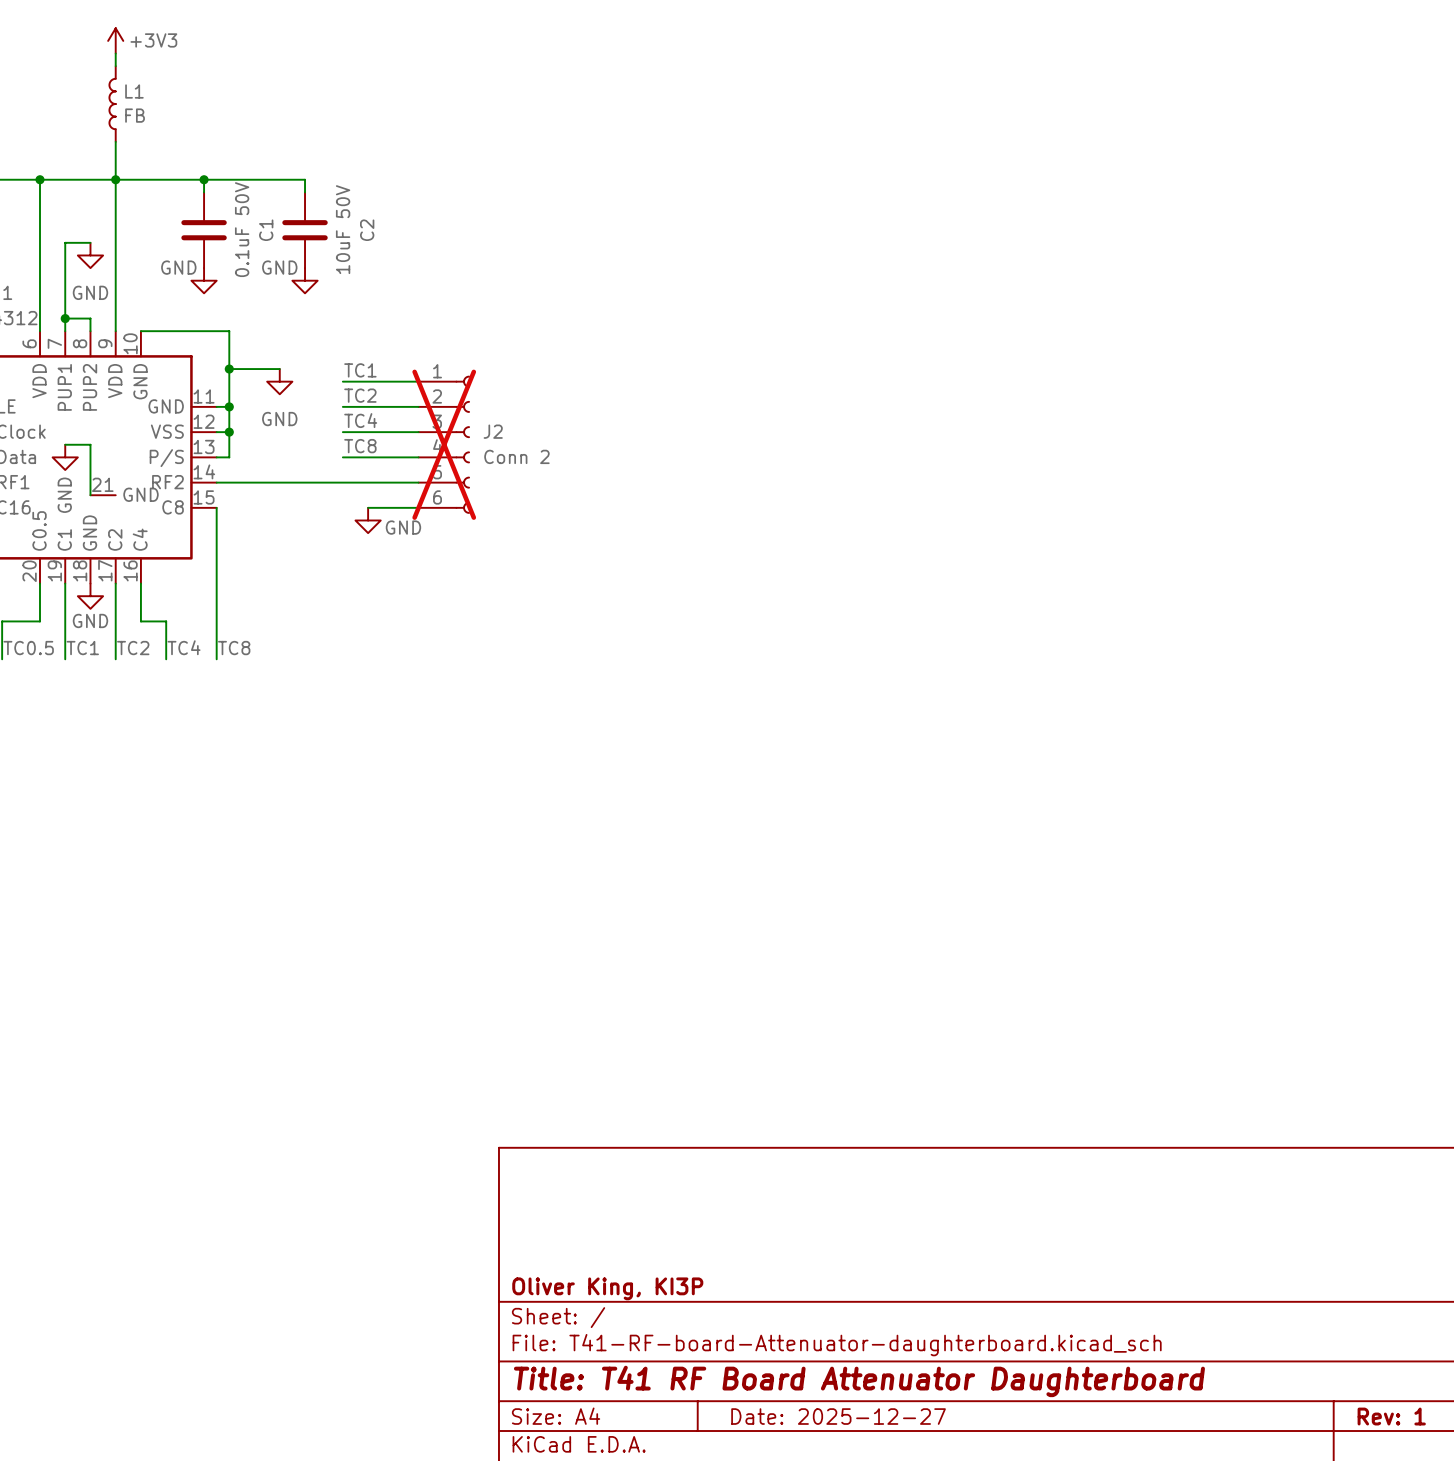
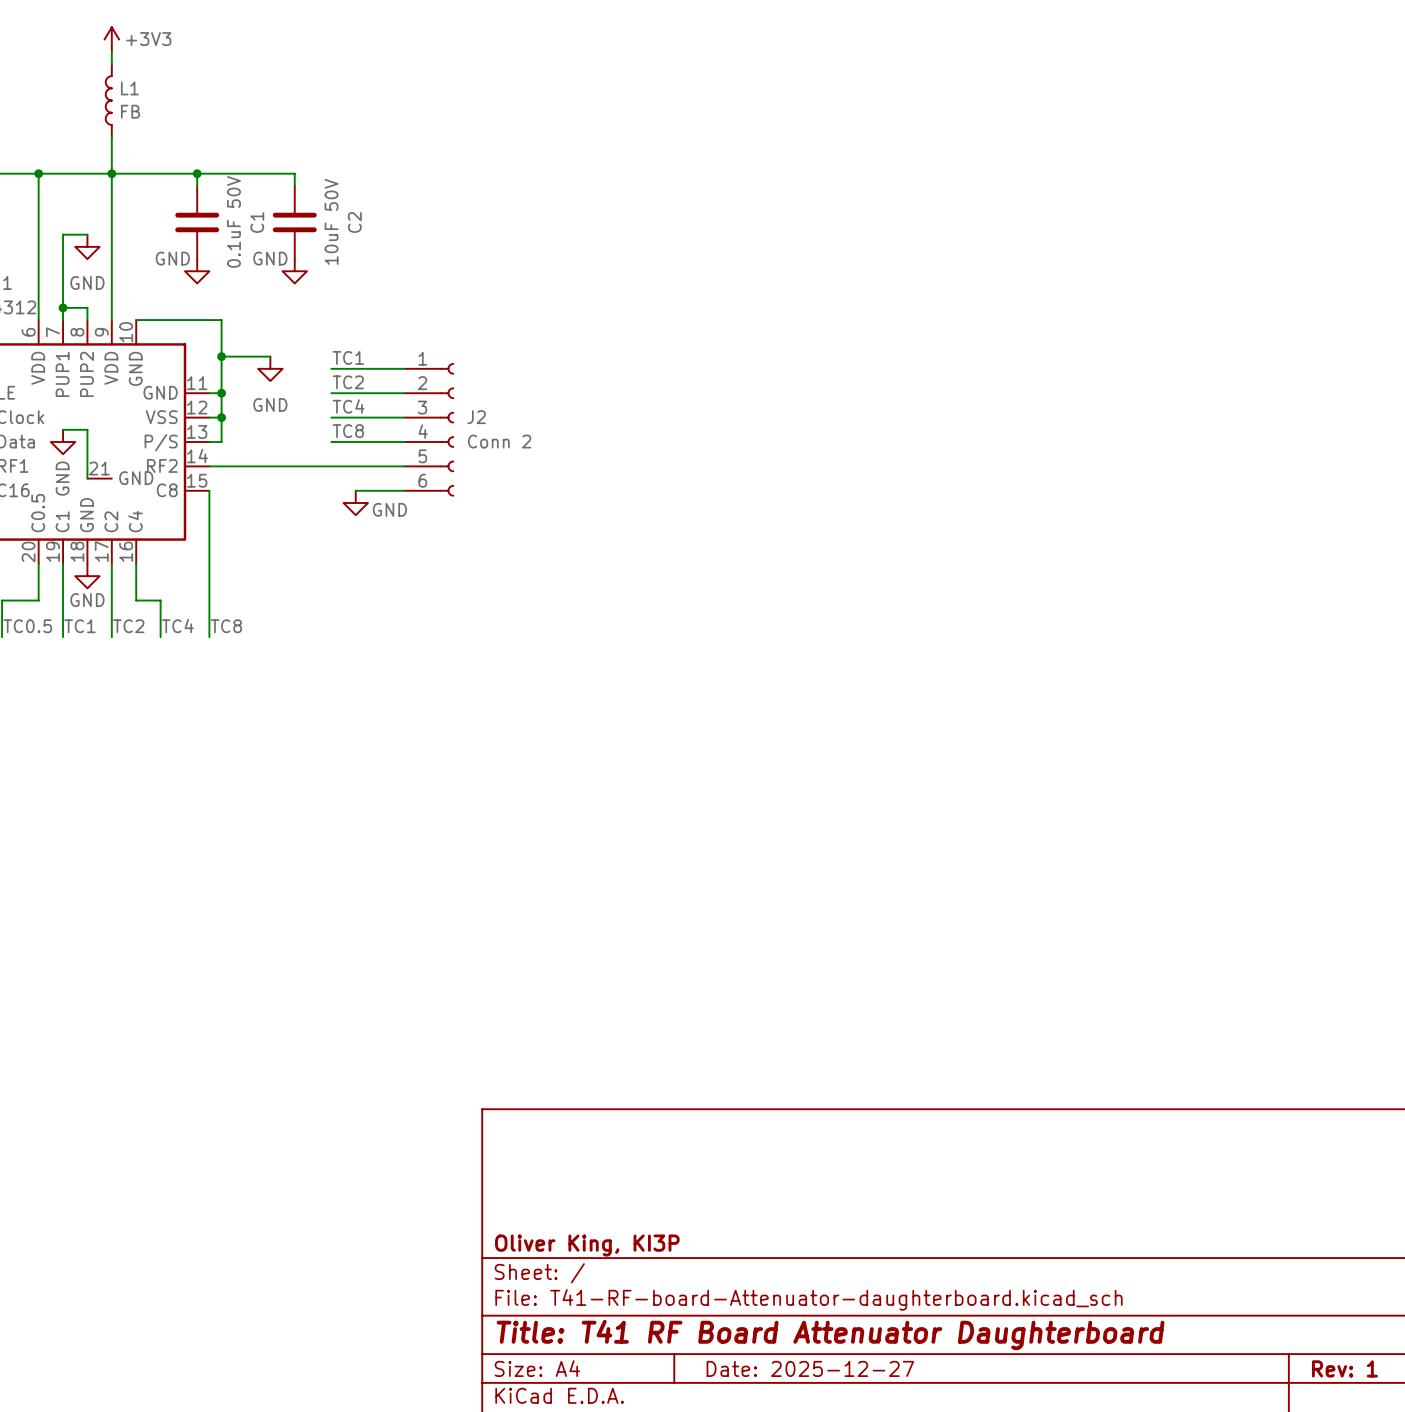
J2 do-not-place cross: (444, 444) -> none

